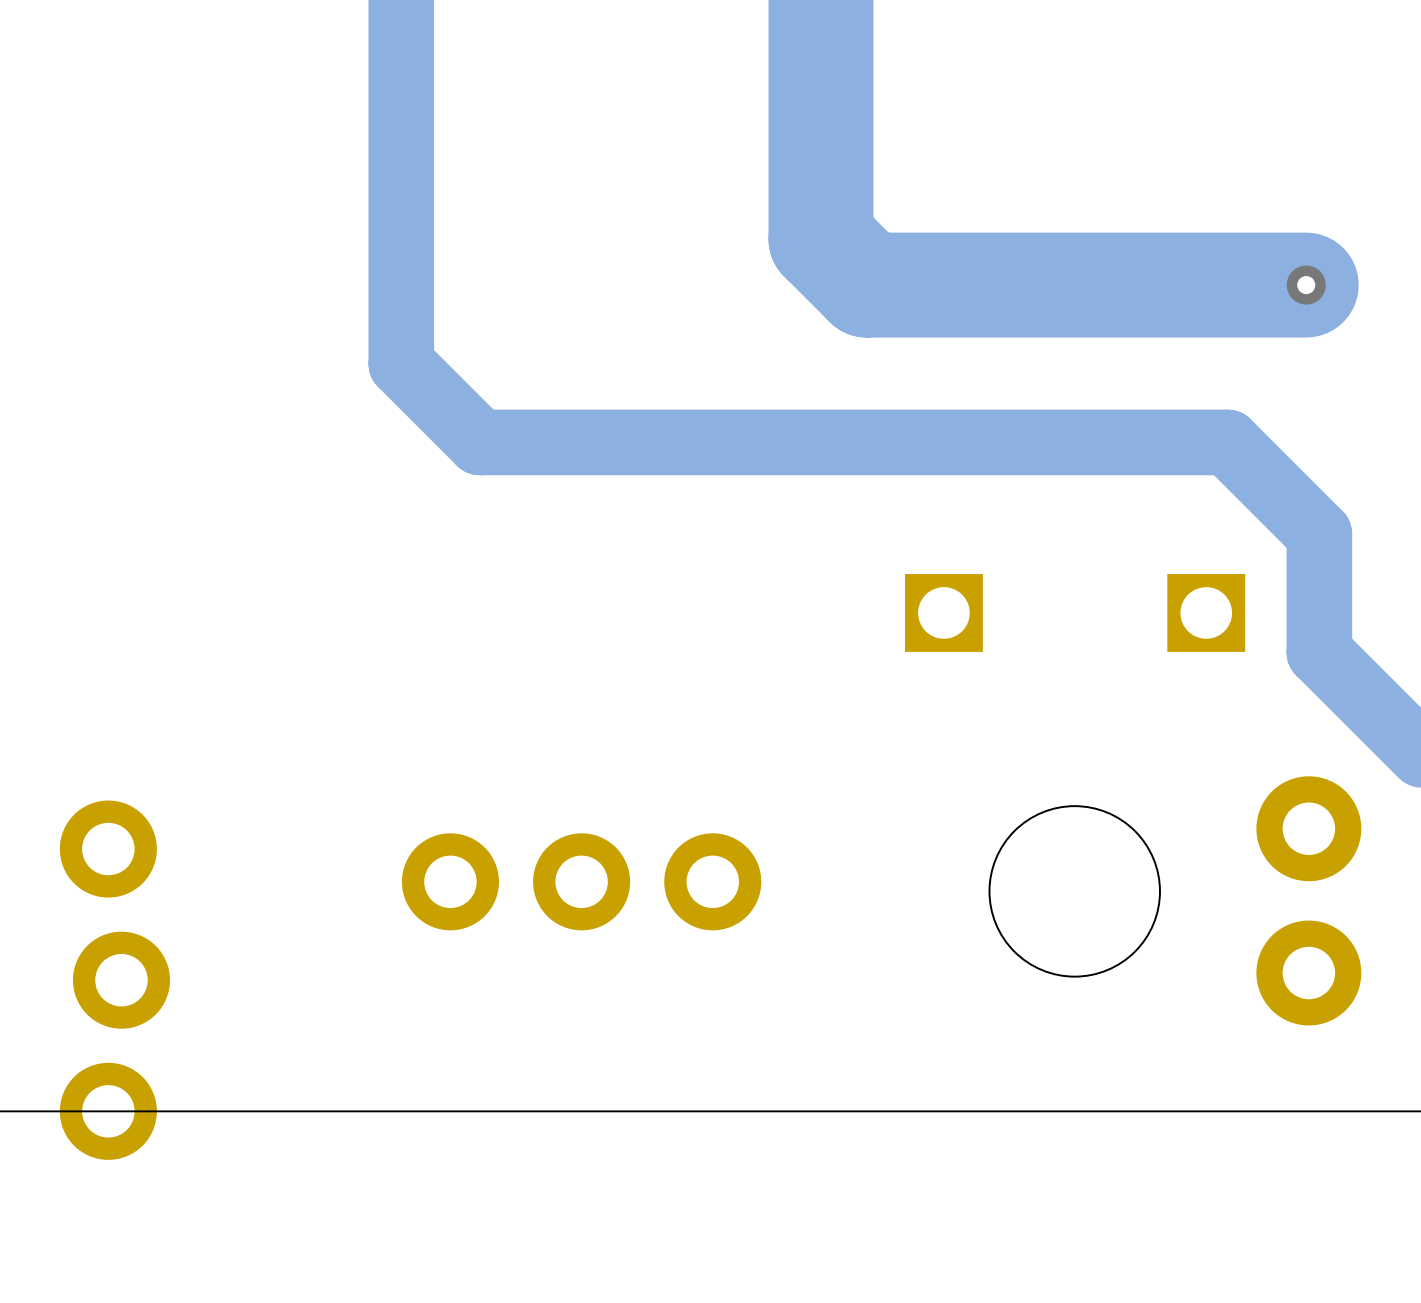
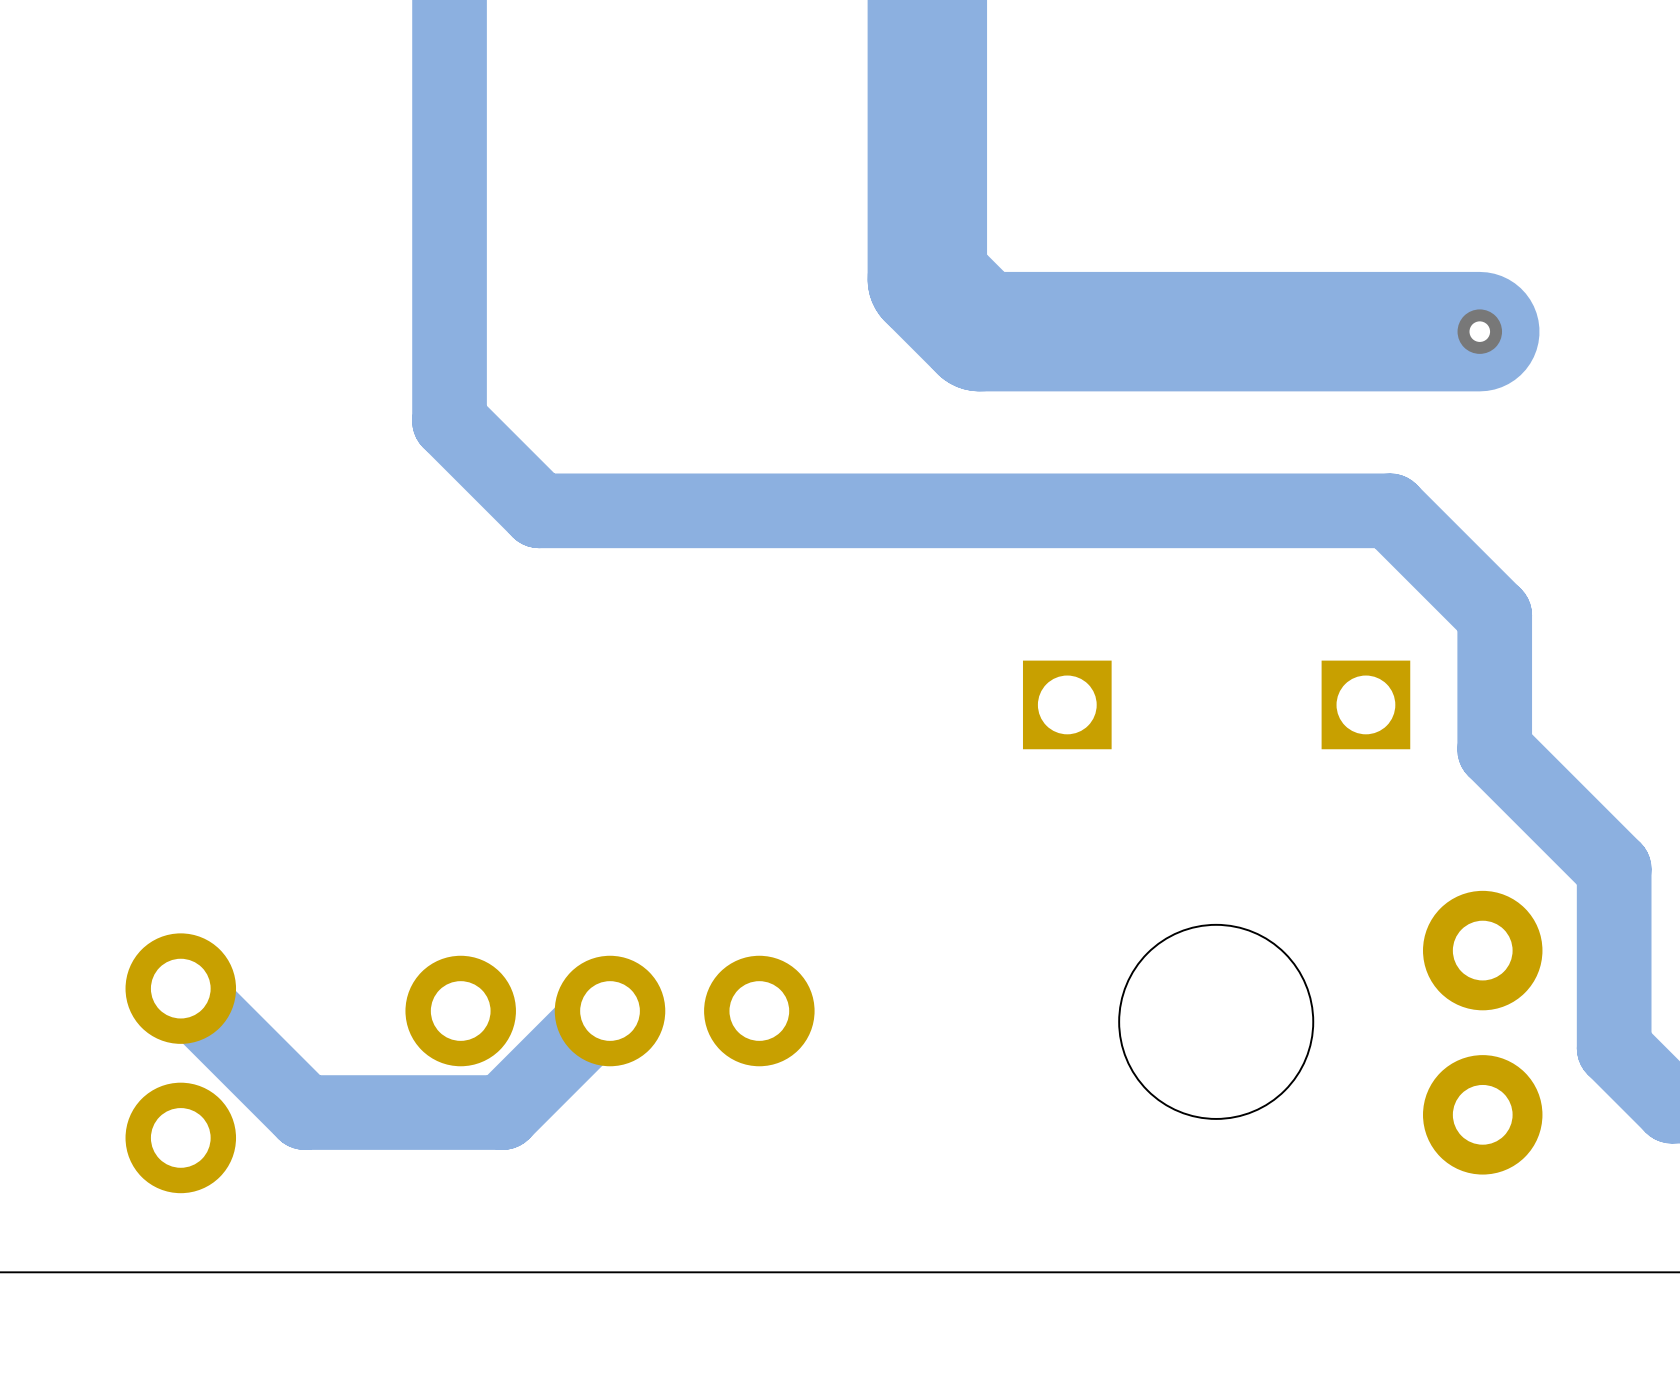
track: none -> (180, 988) (304, 1112) (502, 1112) (604, 1011) (610, 1011)
part position: (581, 881) -> (610, 1011)
part: none -> (180, 1063)
part: (114, 980) -> none

